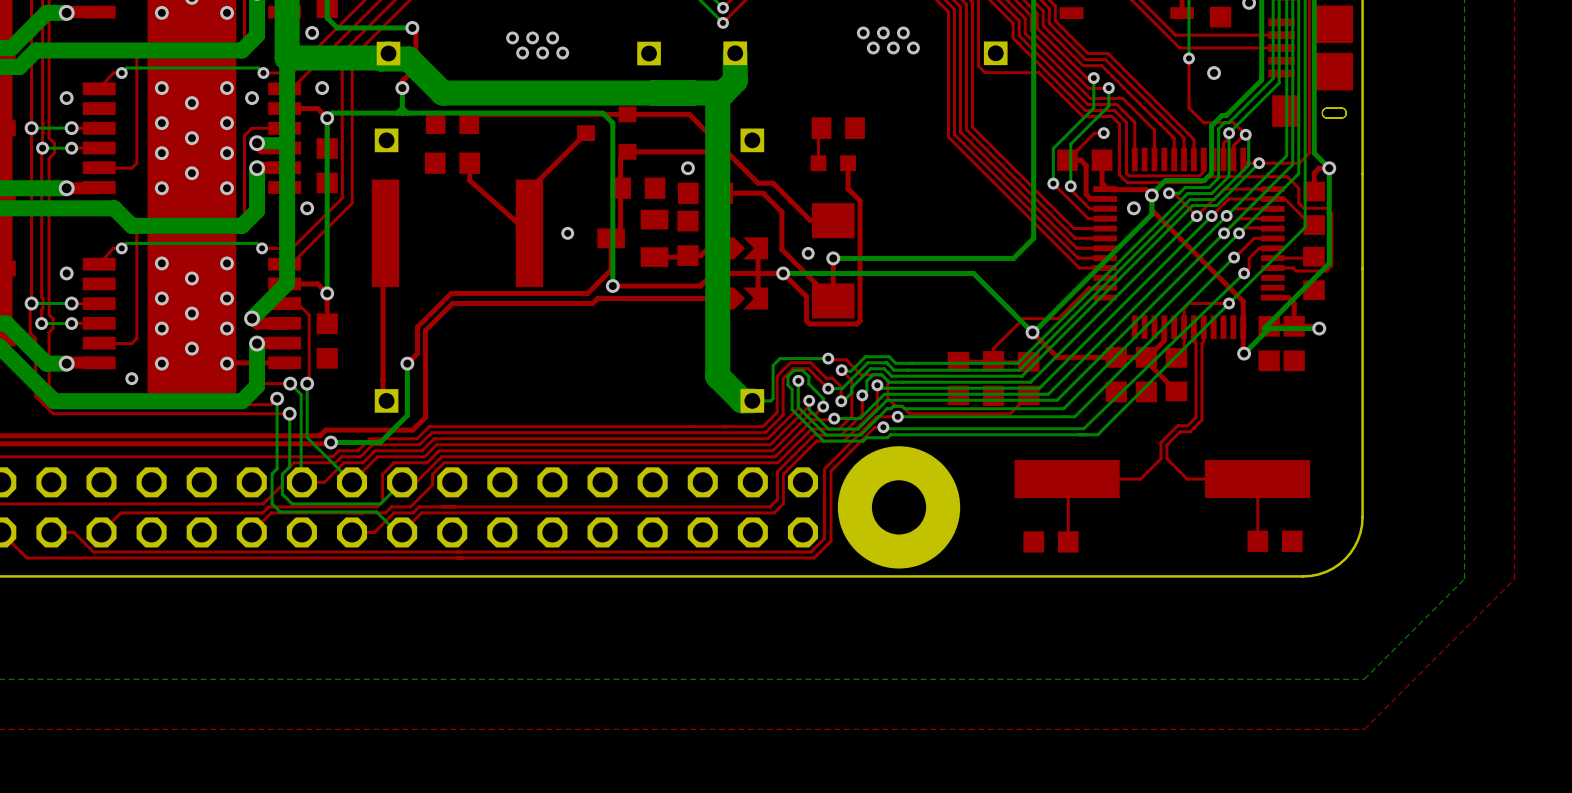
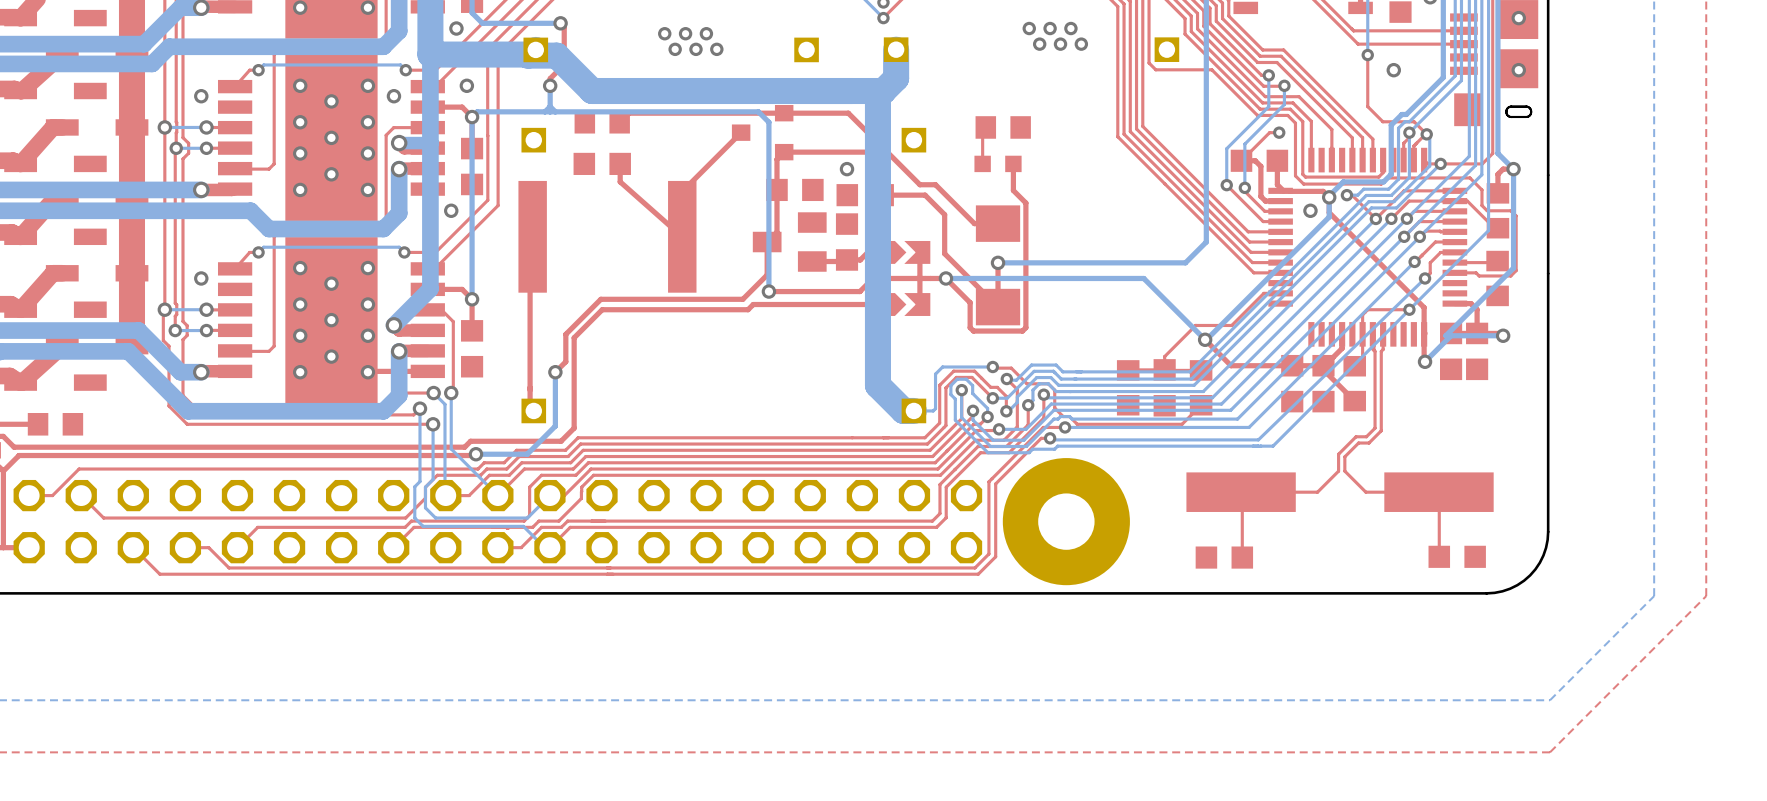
via: none -> (1518, 18)
via: none -> (1518, 70)
via: (567, 233) -> none
via: (808, 253) -> none
via: (131, 378) -> none

